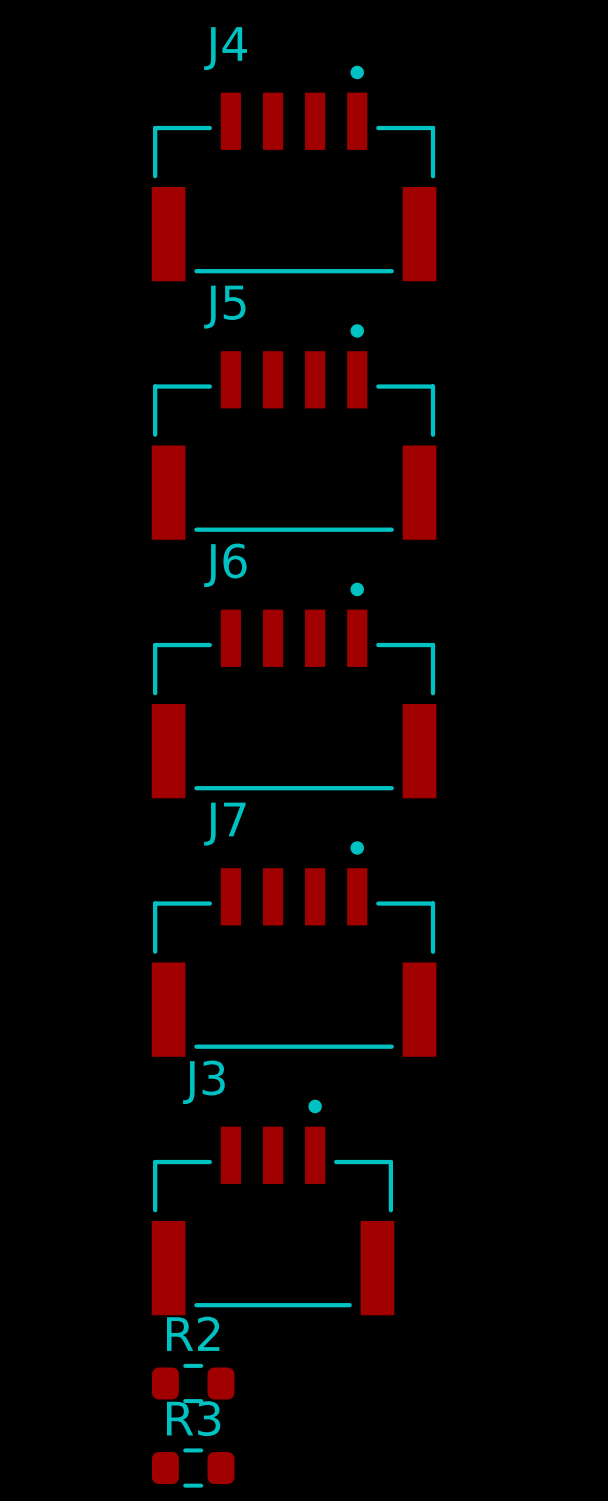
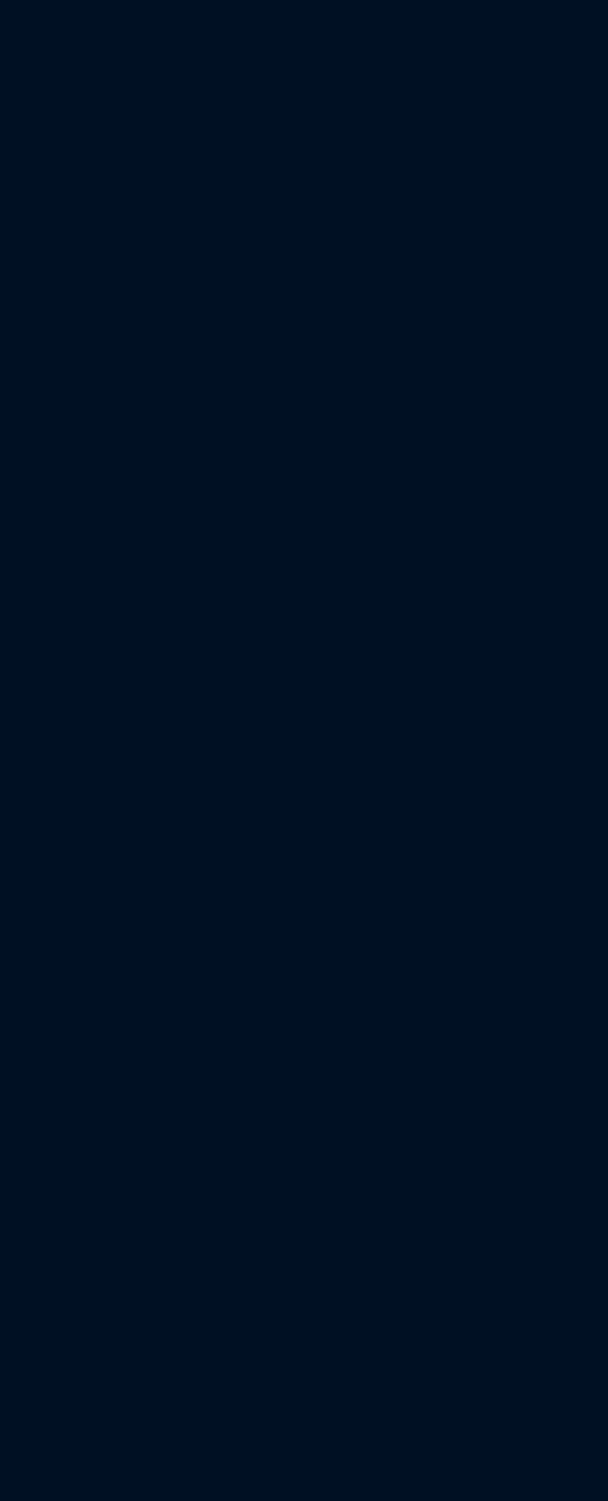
J4: (294, 173) -> none
J5: (294, 432) -> none
J6: (294, 690) -> none
J7: (294, 949) -> none
J3: (273, 1207) -> none
R2: (193, 1383) -> none
R3: (193, 1468) -> none

